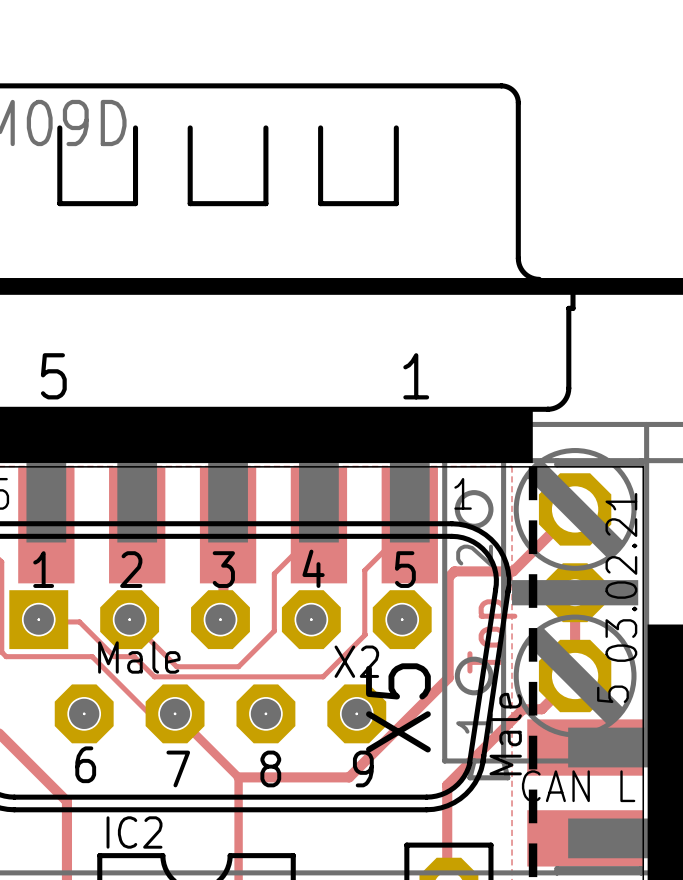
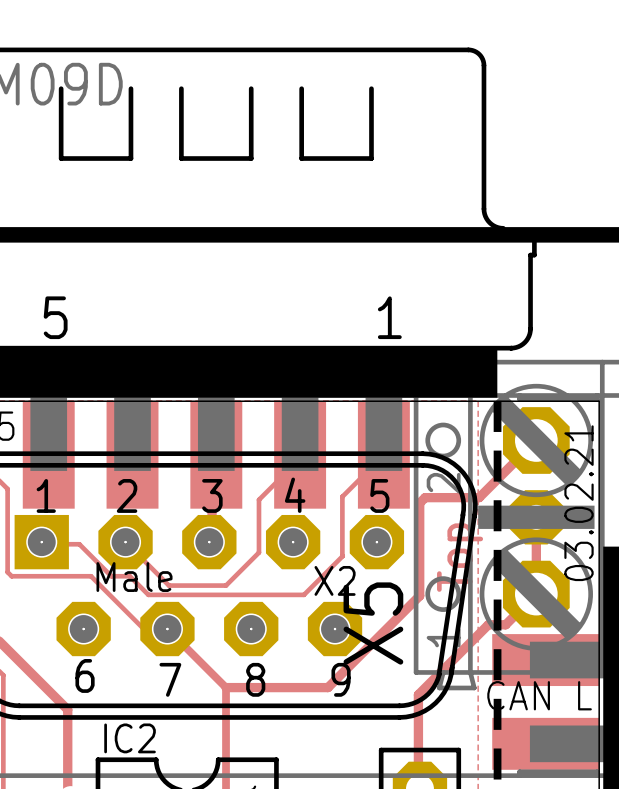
text: 1 (463, 493) -> none
text: 5 (612, 694) -> none
part value: Male (505, 734) -> none

